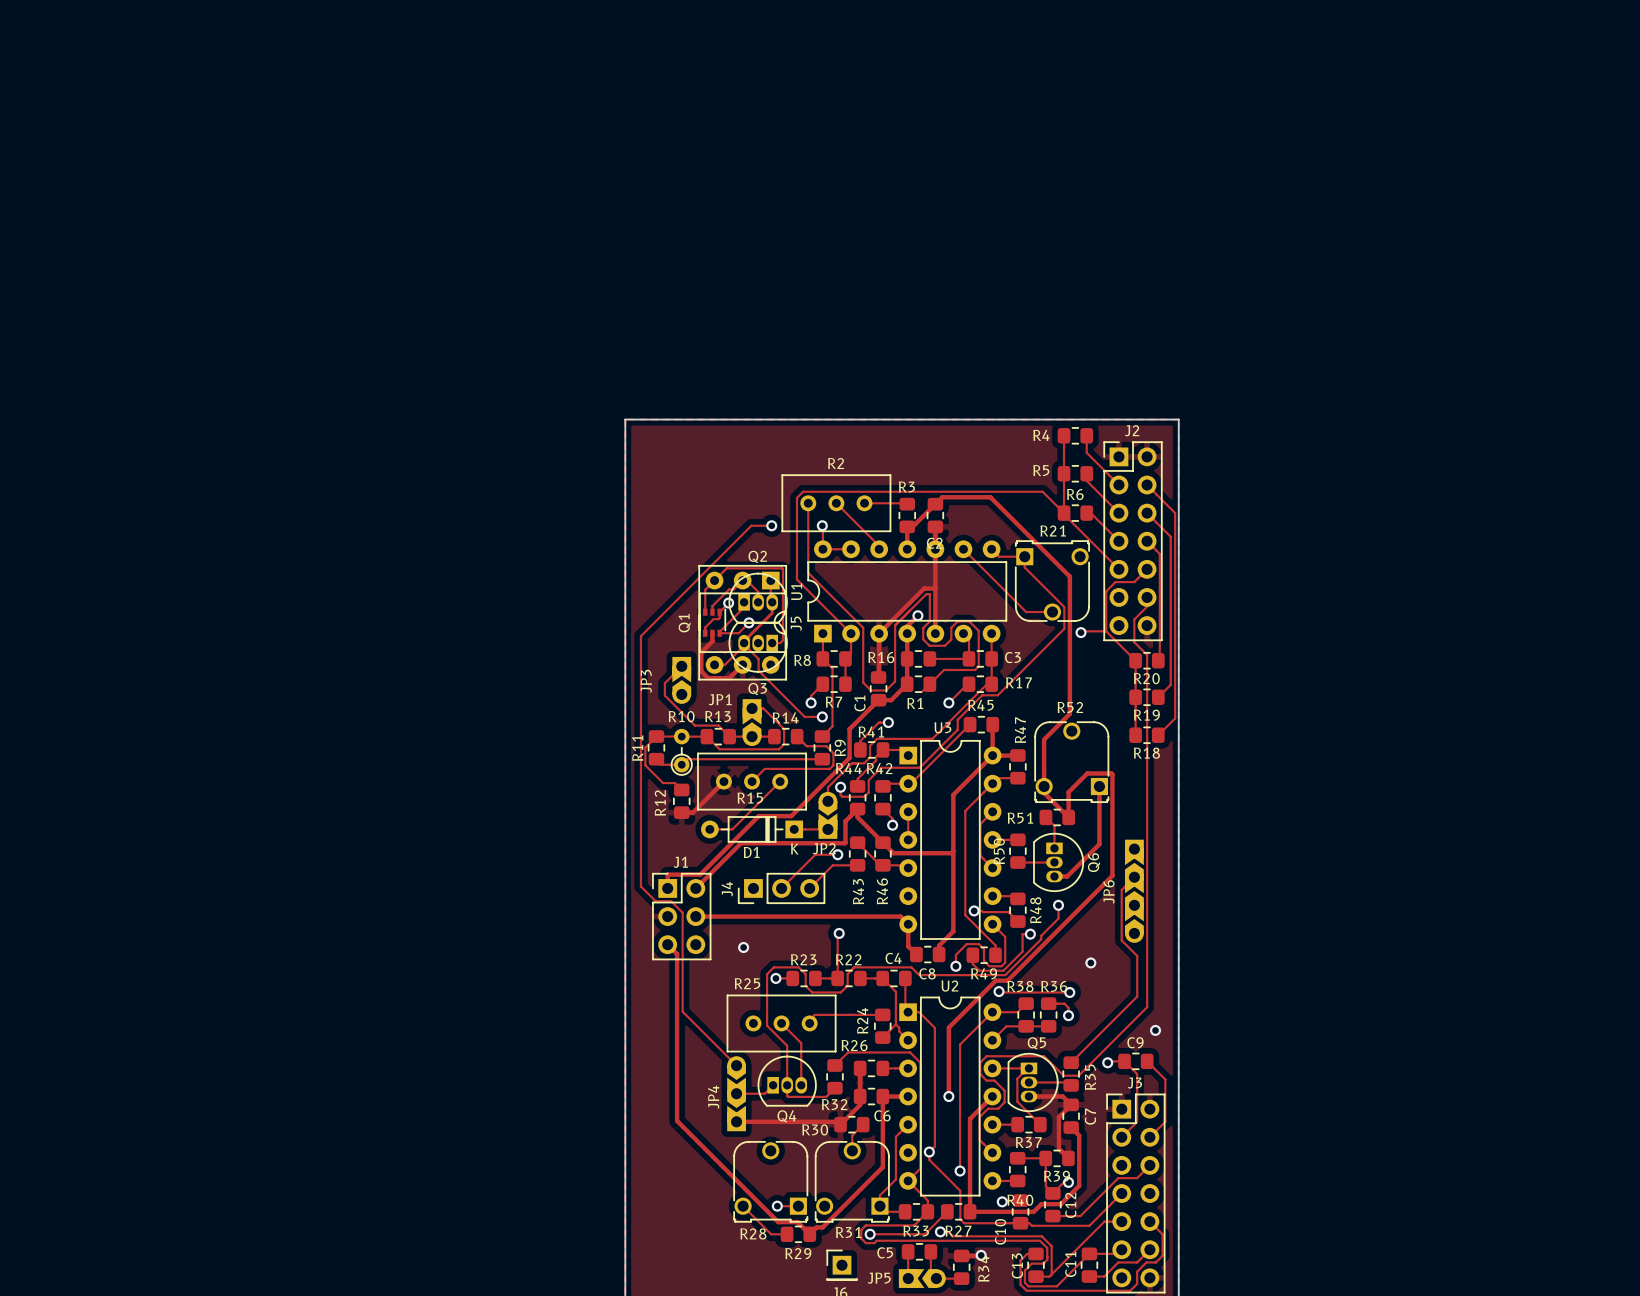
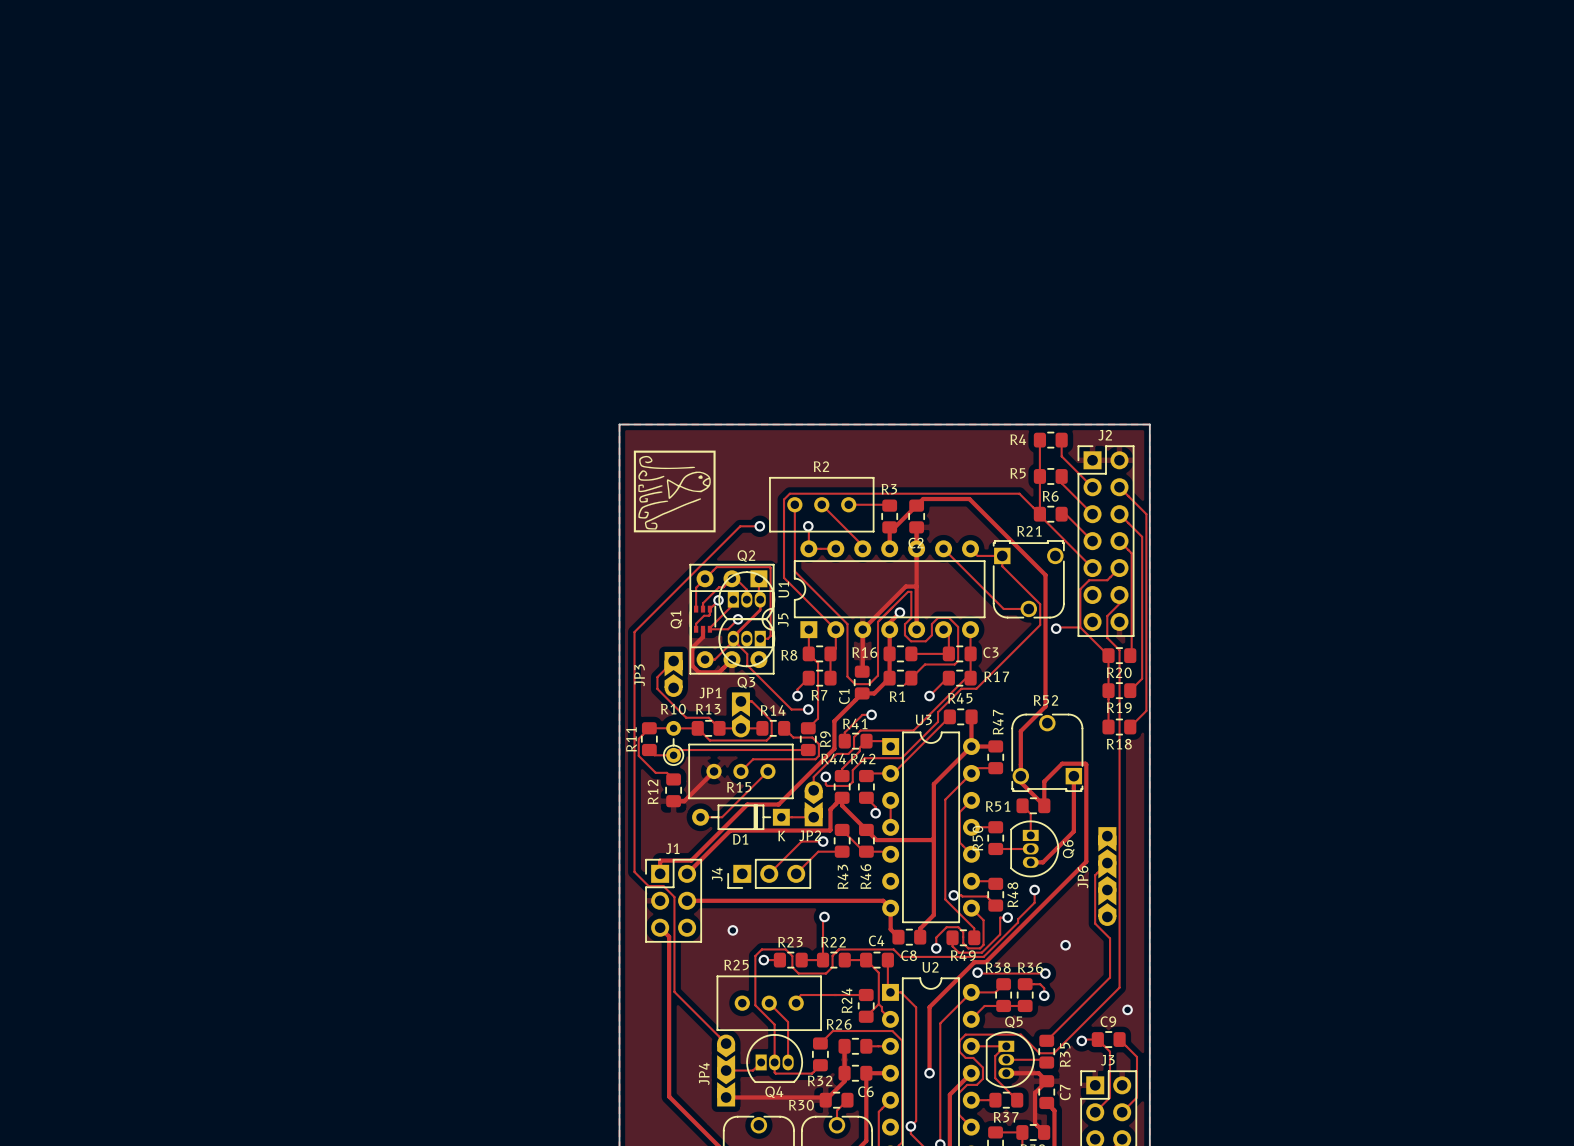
drawing: none -> [633, 450, 716, 533]

